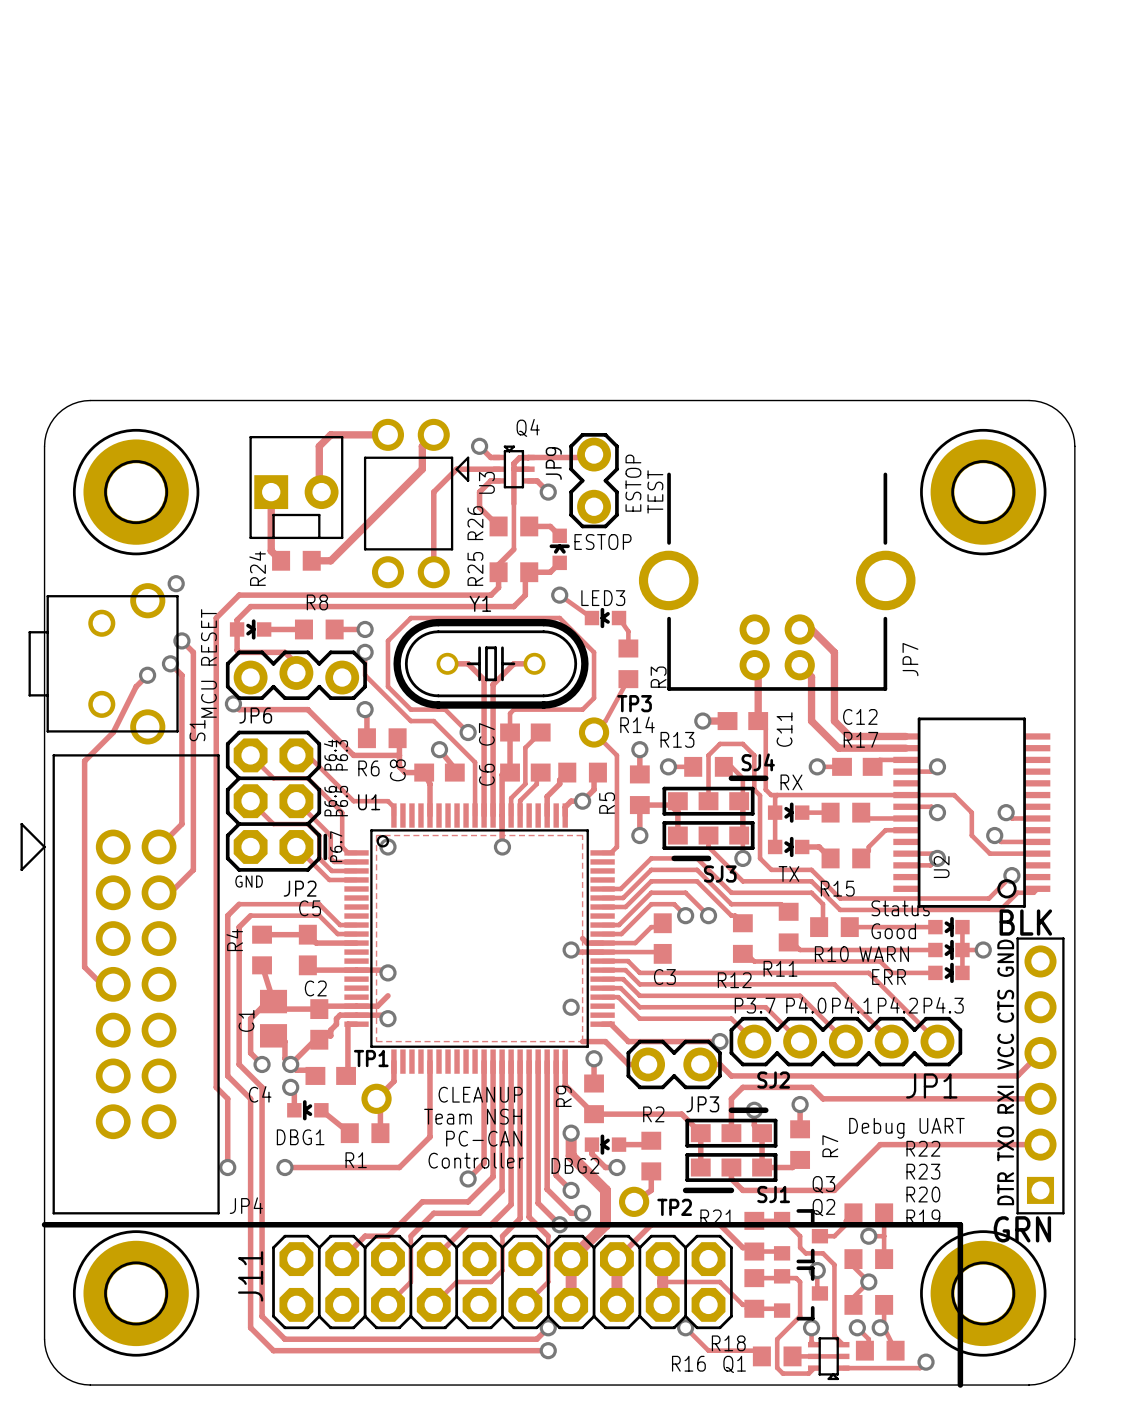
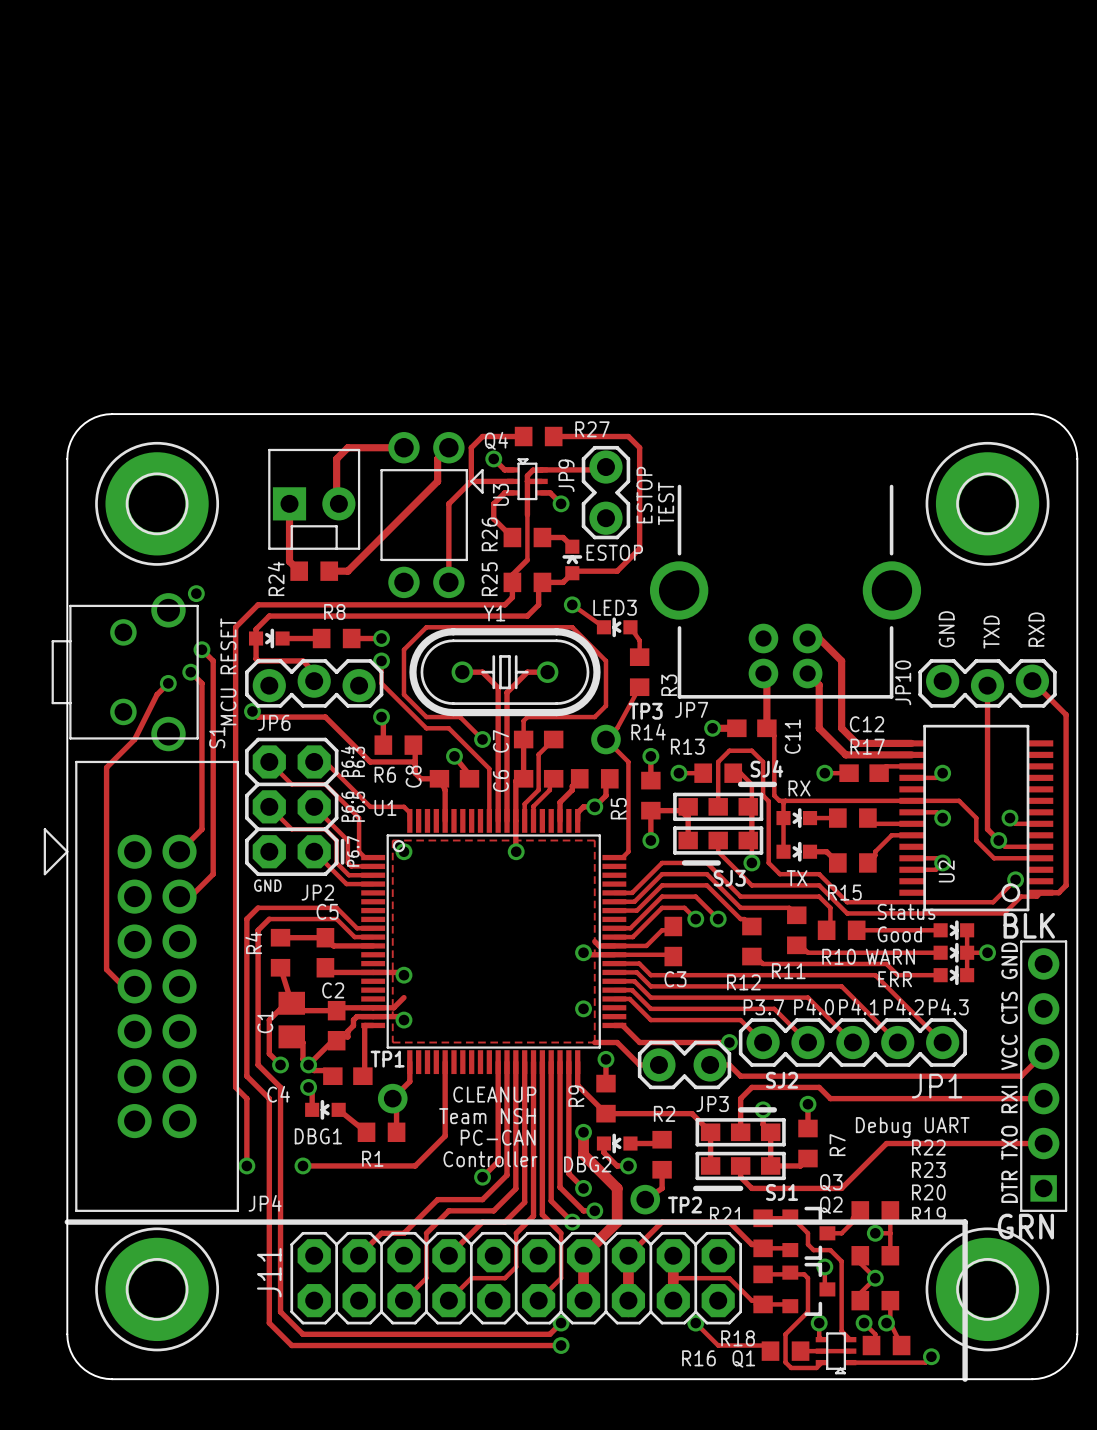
track: none -> (523, 436) (482, 436) (471, 447) (471, 481)
R27: none -> (538, 436)
track: none -> (553, 436) (628, 436) (639, 447) (639, 548) (617, 571) (574, 571) (572, 573)
Q4 name position: Q4 (528, 427) -> Q4 (496, 440)
text: none -> GND (946, 629)
text: none -> RXD (1036, 629)
text: none -> TXD (991, 632)
JP7 name rotation: 0° (910, 659) -> 90° clockwise (691, 709)
JP7 name position: JP7 (910, 659) -> JP7 (691, 709)
track: none -> (1032, 681) (1066, 714) (1066, 885) (1058, 892) (1040, 892)
JP10: none -> (987, 683)
track: none -> (987, 685) (987, 829) (998, 840)

